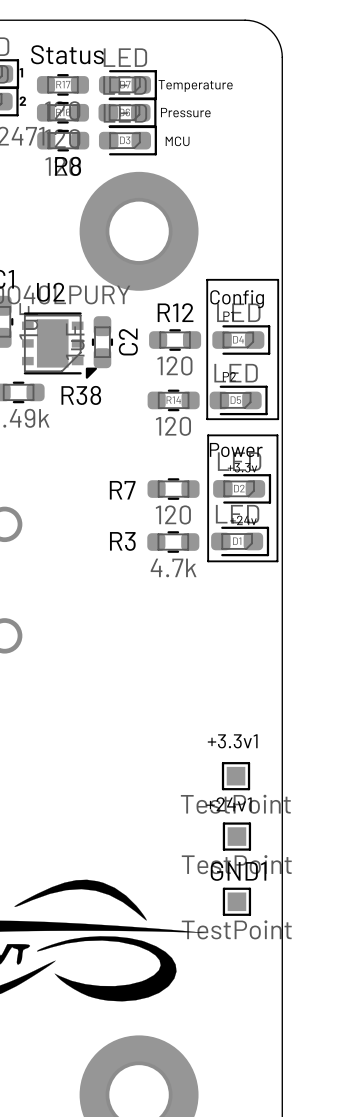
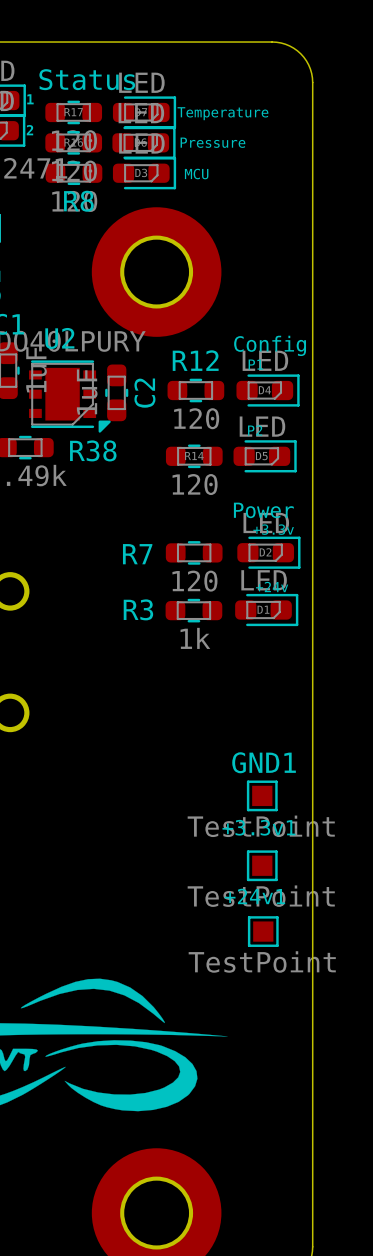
line: (207, 279) (278, 279) (278, 419) (207, 419) (207, 279) -> none
line: (208, 435) (277, 435) (277, 561) (208, 561) (208, 435) -> none
R3 value: 4.7k (173, 567) -> 1k (195, 638)
GND1 position: (236, 901) -> (262, 795)

